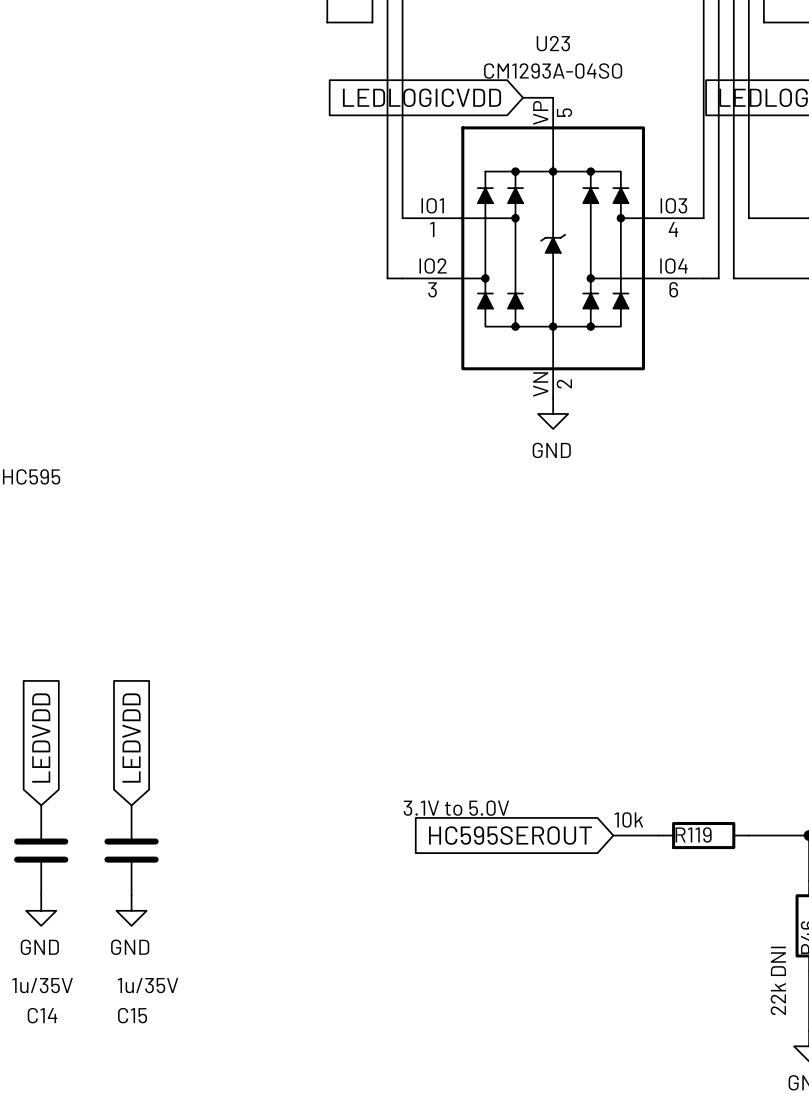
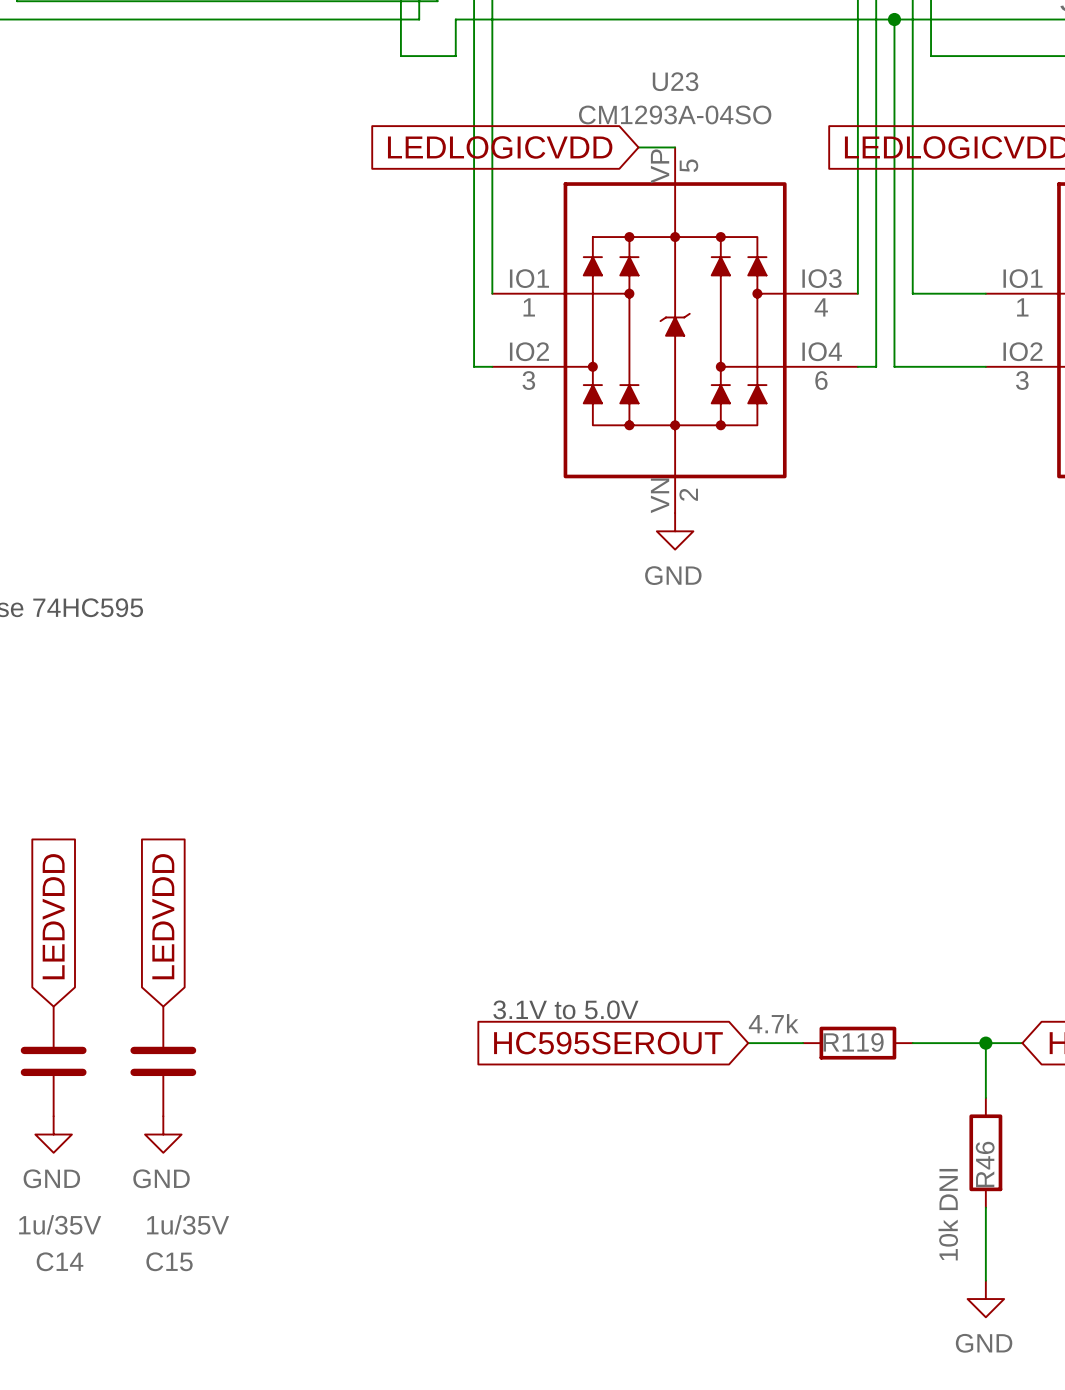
R119 value: 10k (628, 819) -> 4.7k (773, 1023)
R46 value: 22k DNI (778, 980) -> 10k DNI (948, 1214)

